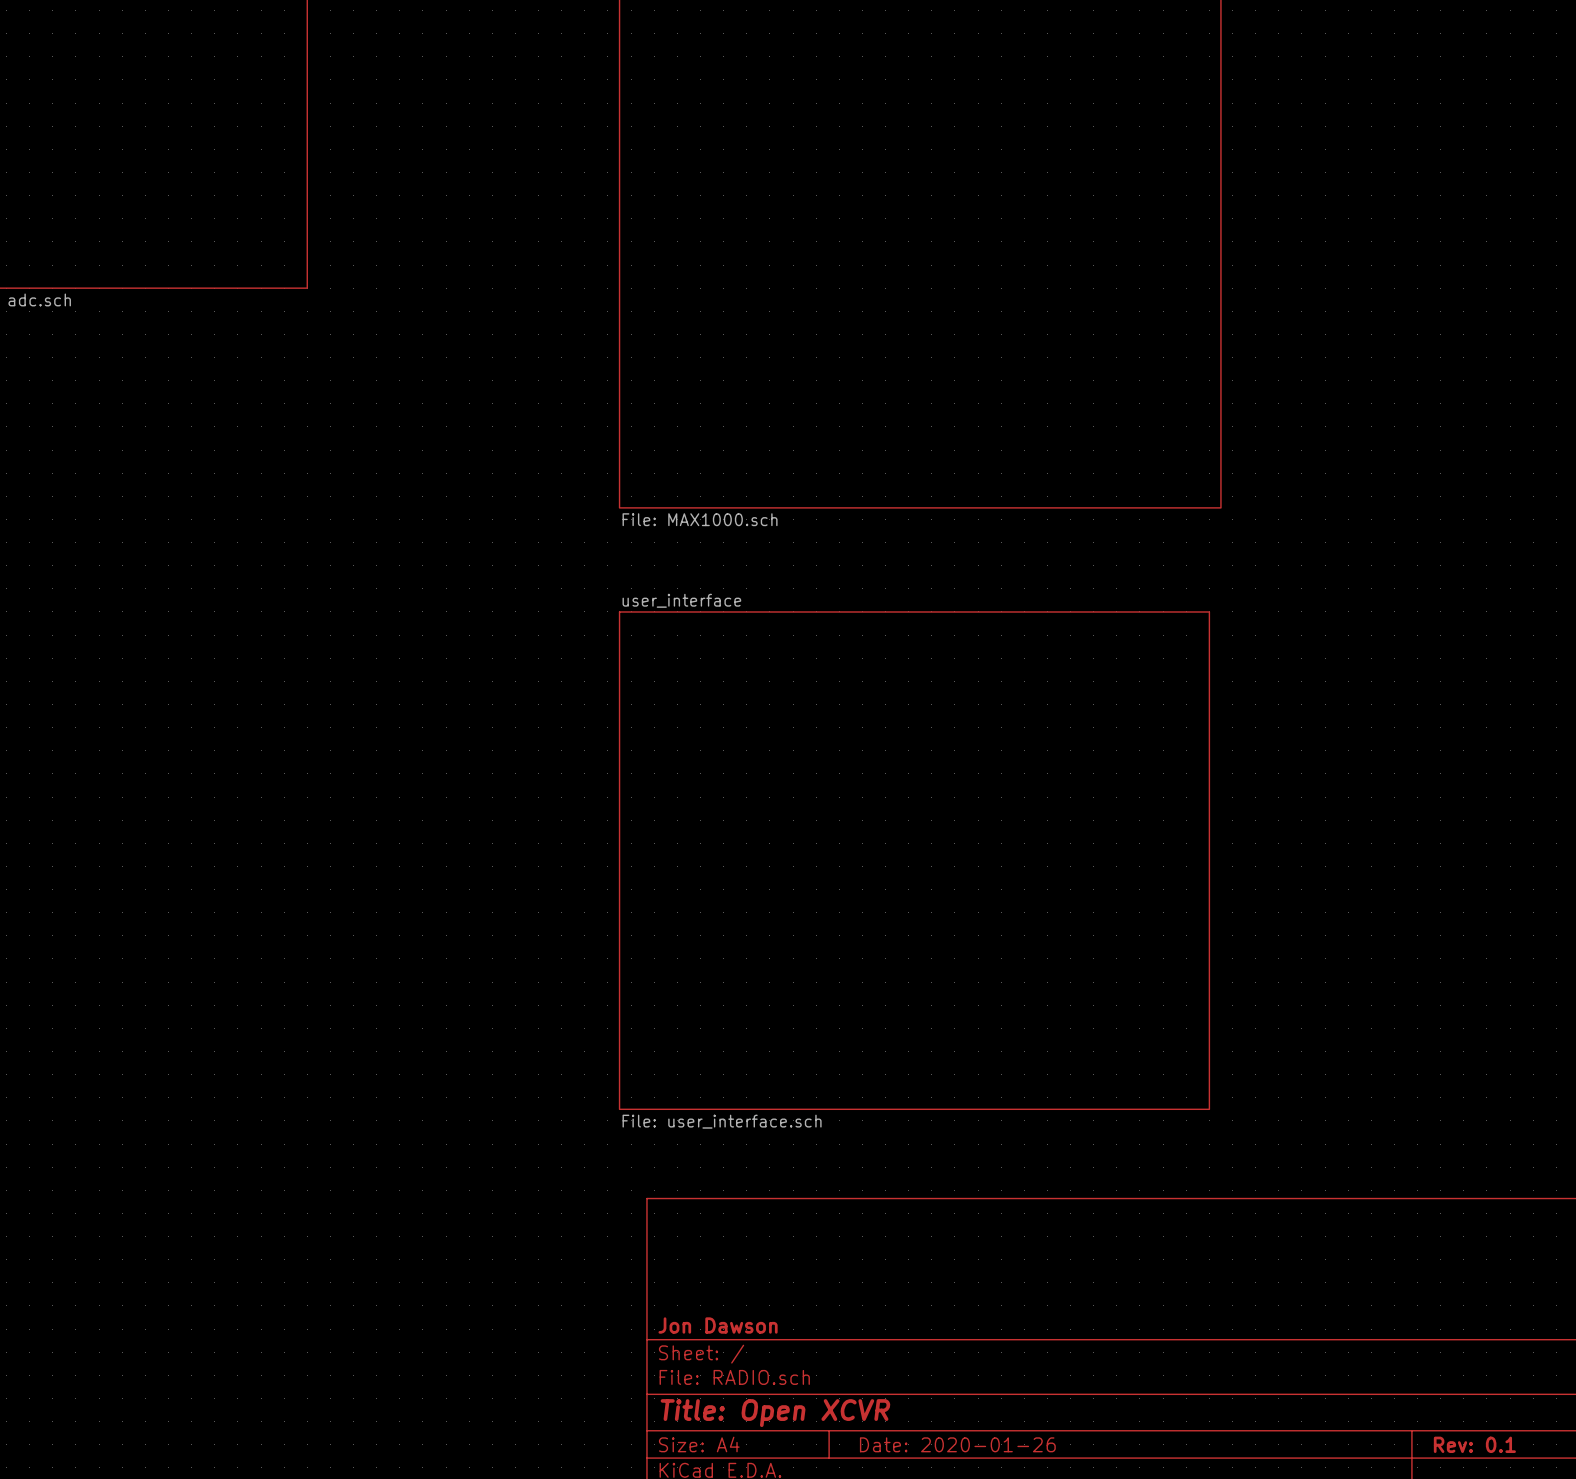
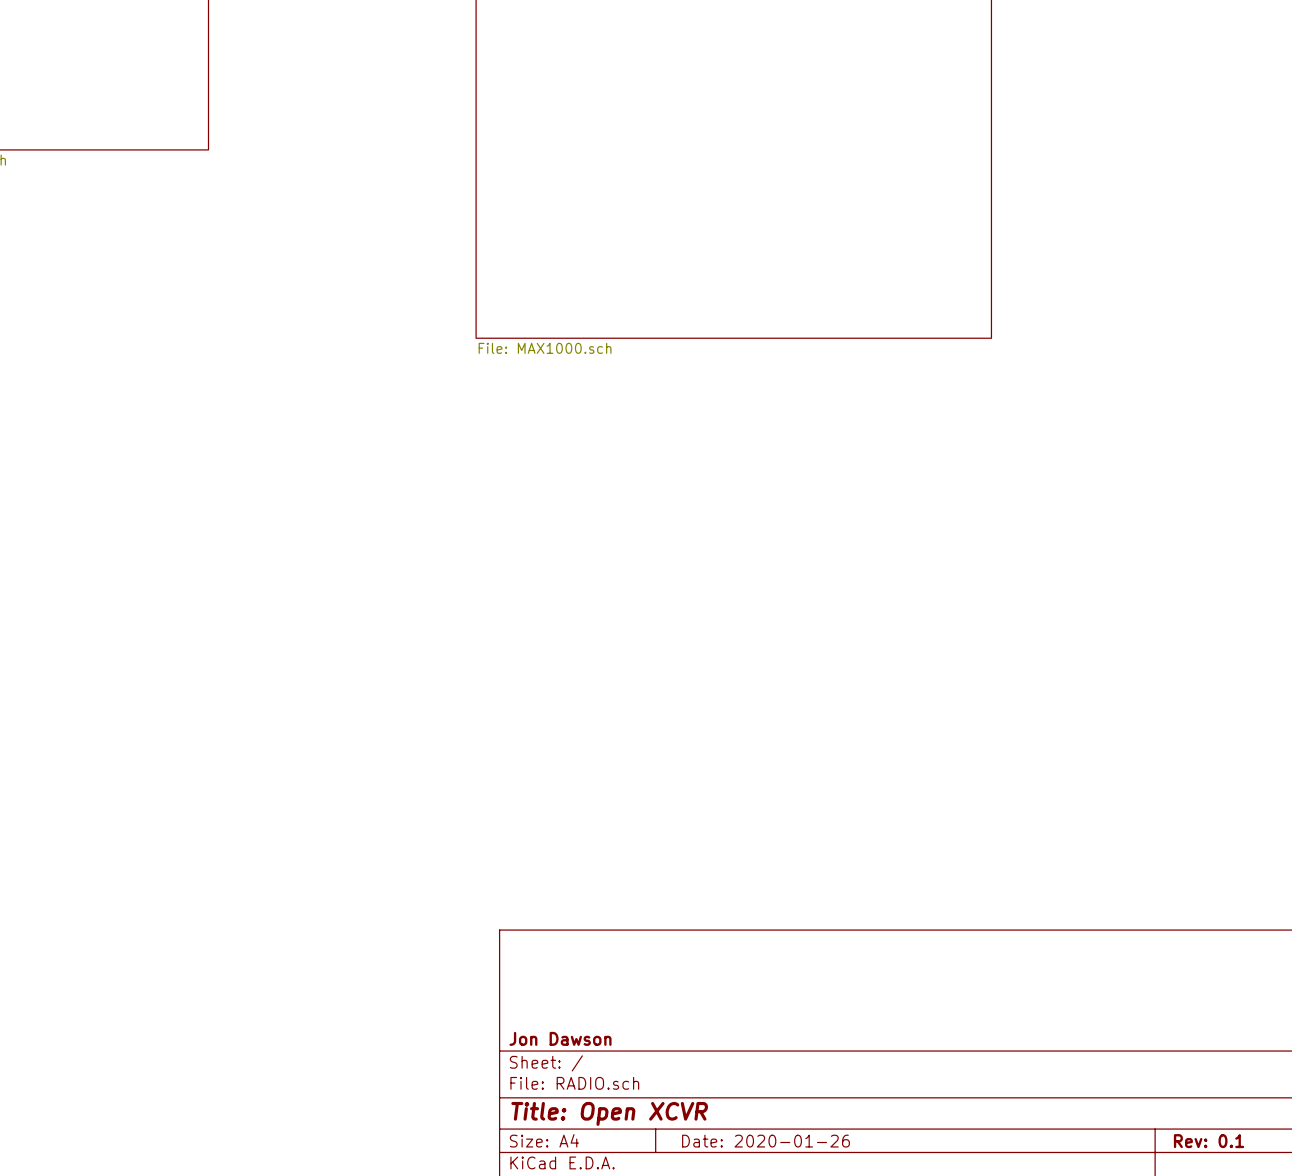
sheet user_interface: File: user_interface.sch (914, 860) -> none

